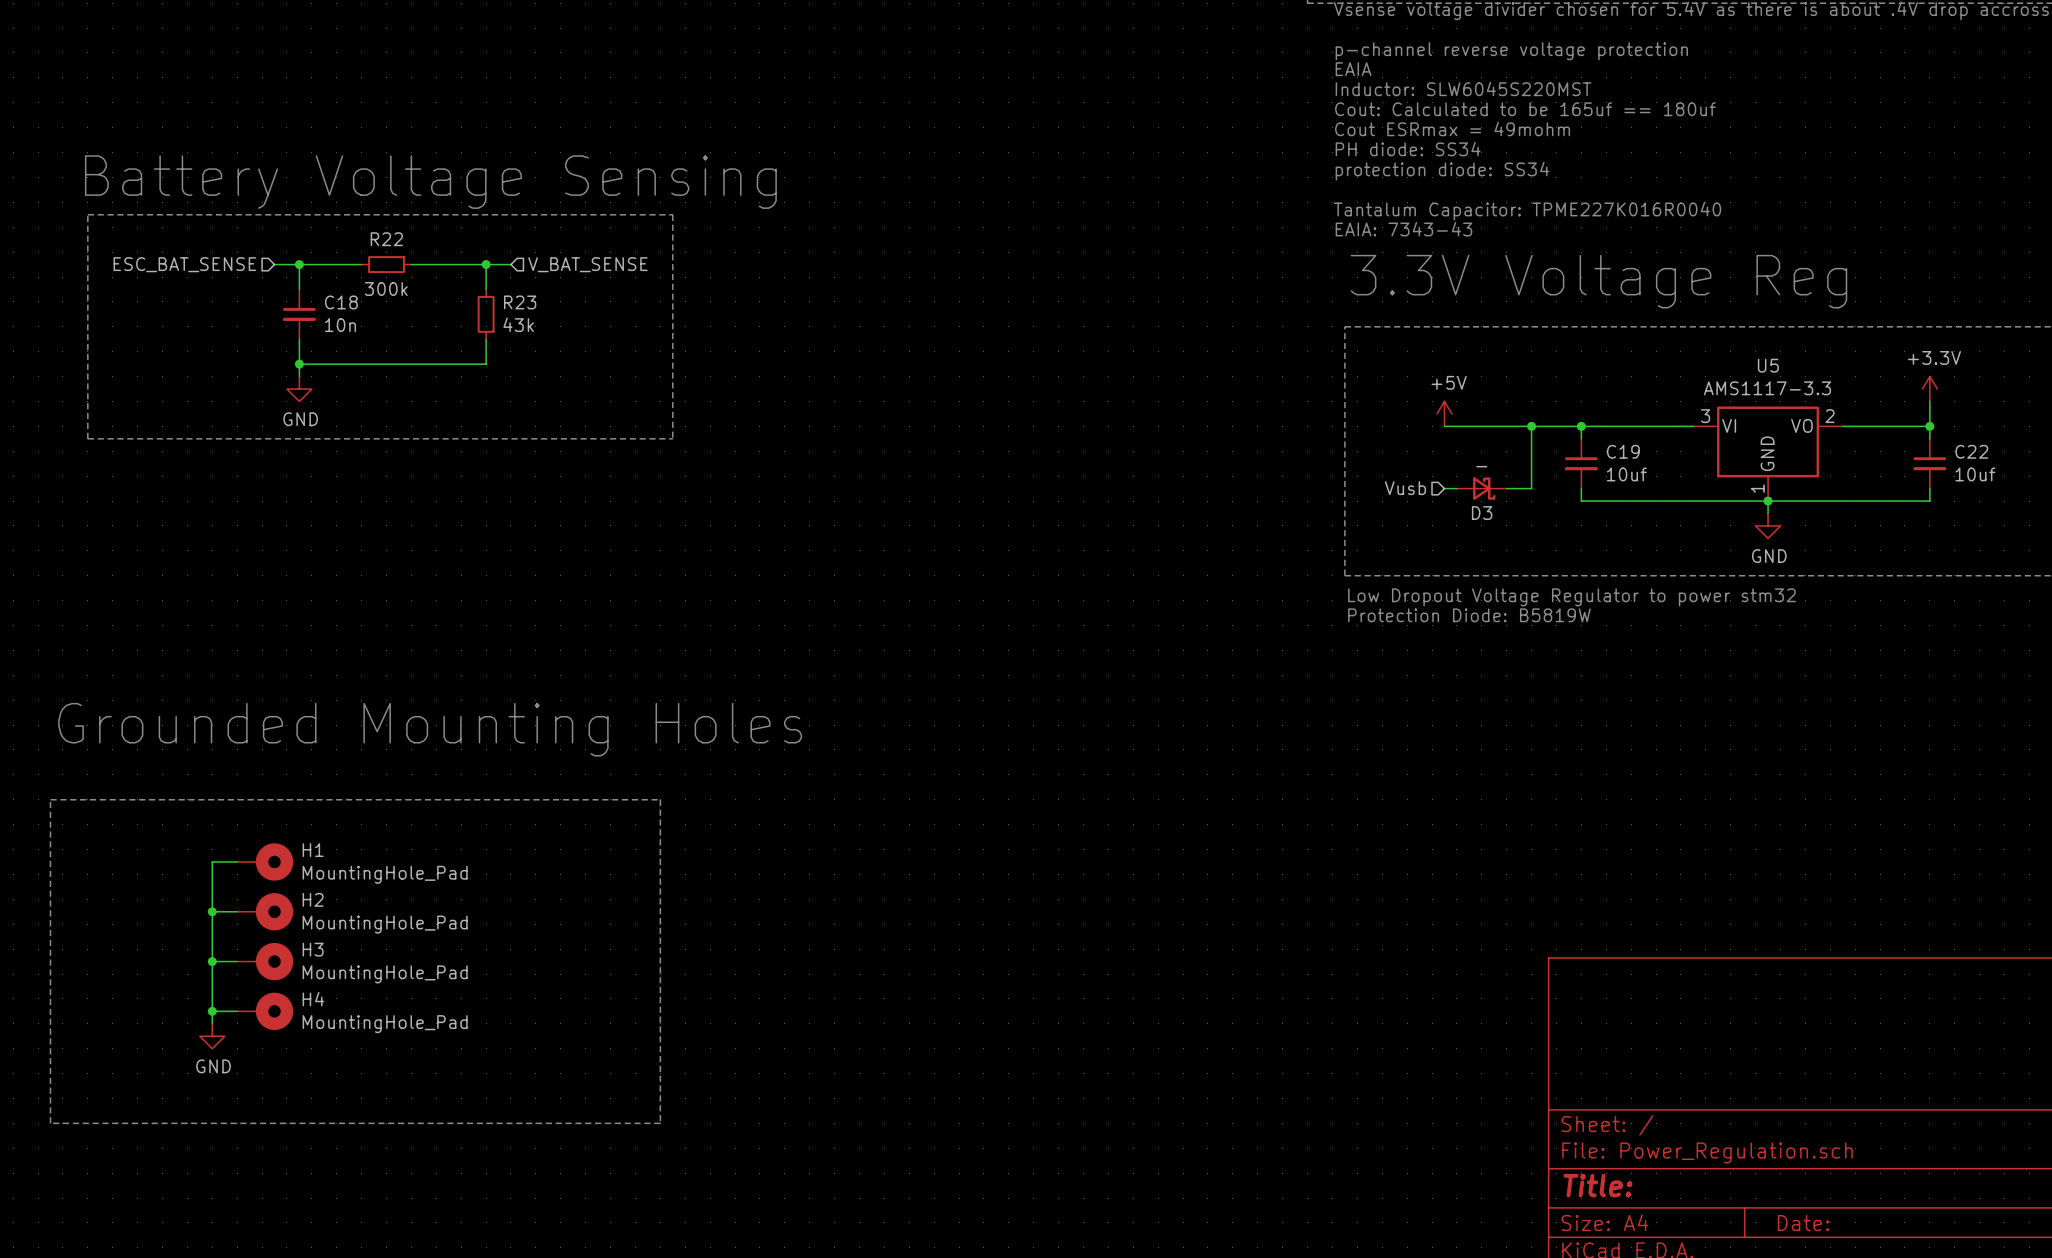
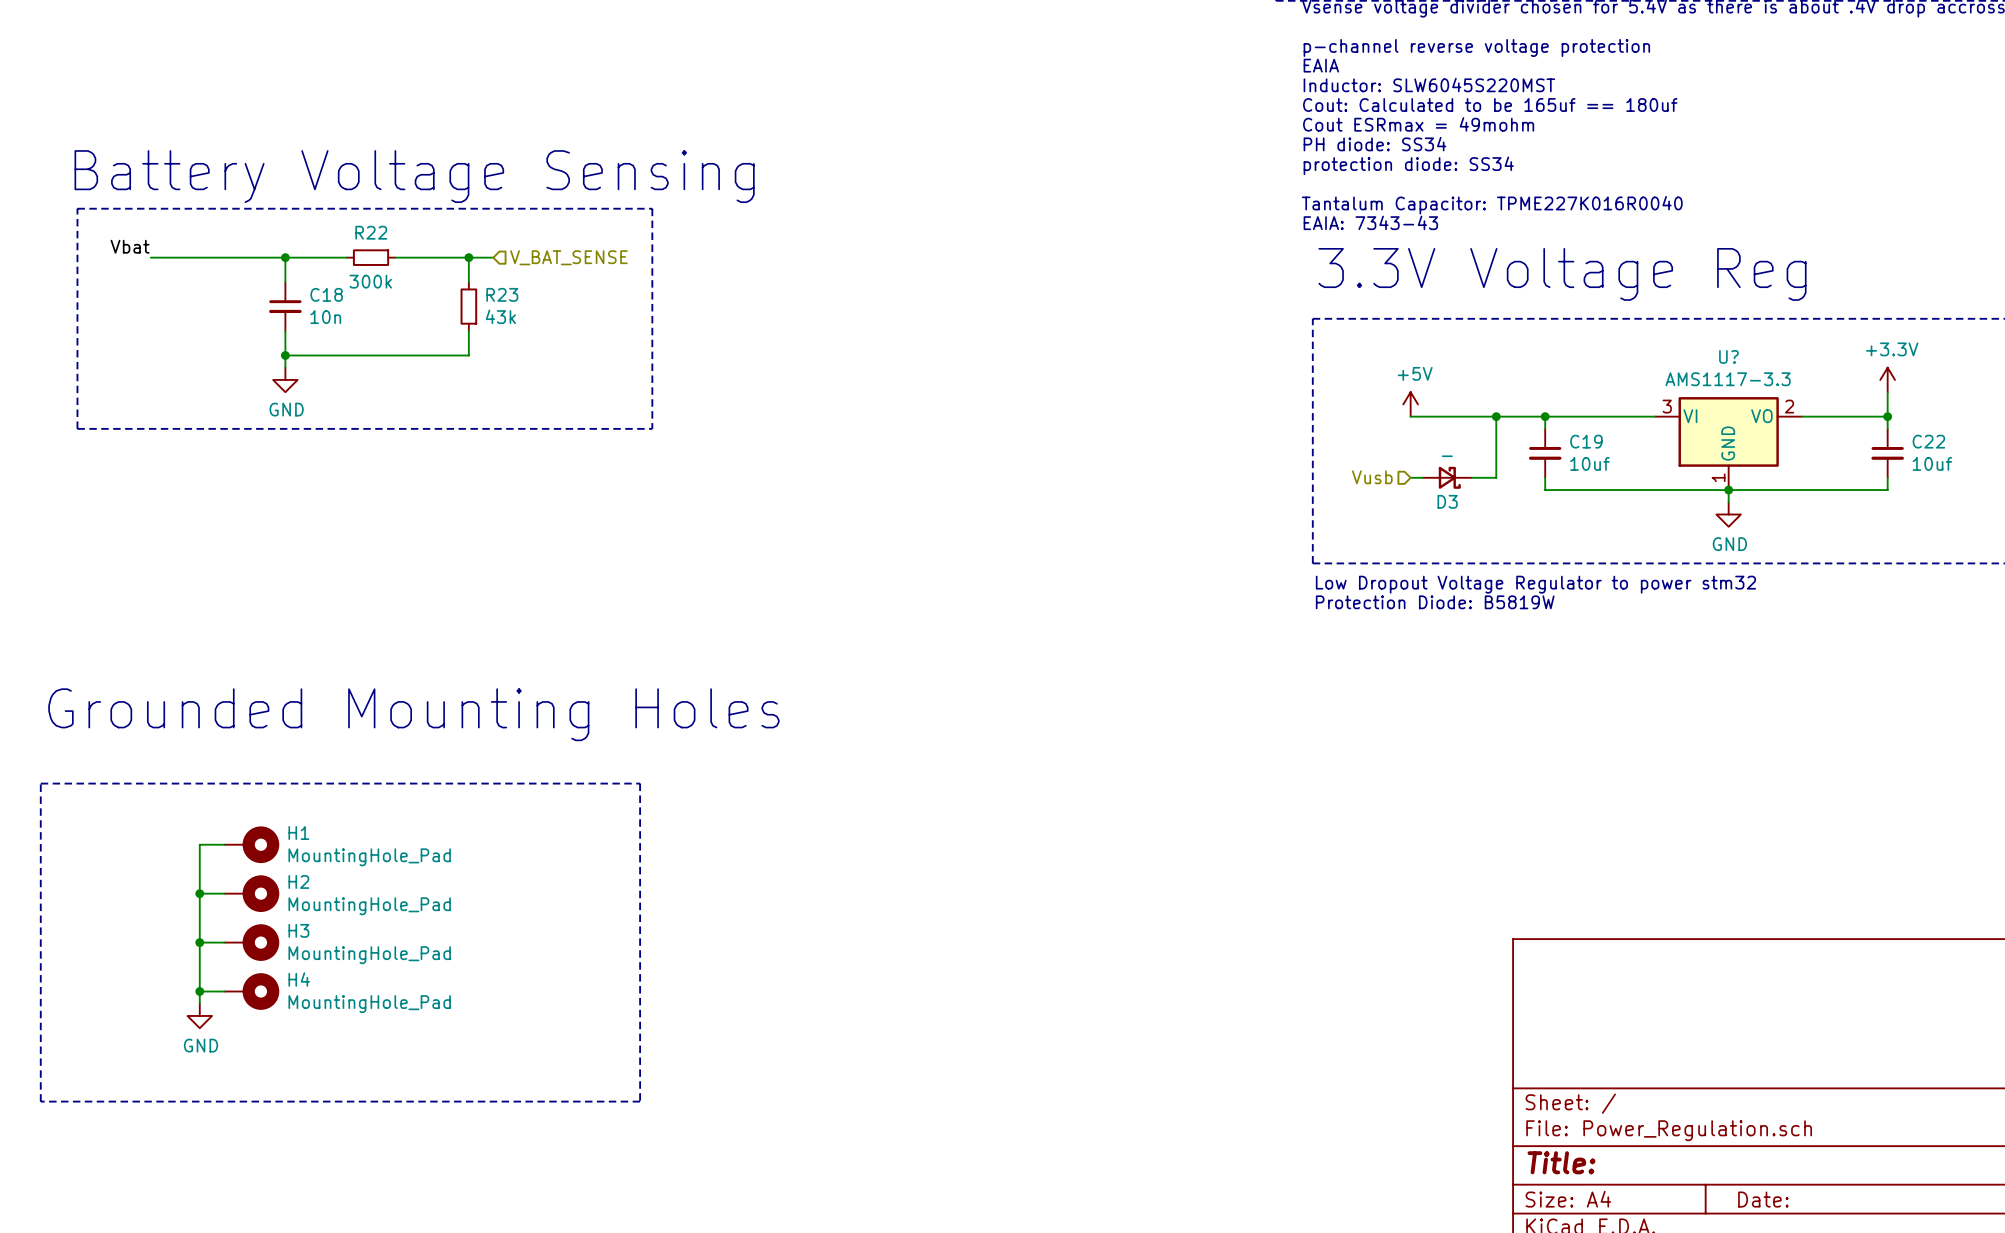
label: none -> Vbat (130, 246)
wire: none -> (150, 257) (260, 257)
hierarchical label: ESC_BAT_SENSE (184, 264) -> none
U5 name: U5 (1768, 365) -> U? (1728, 356)

